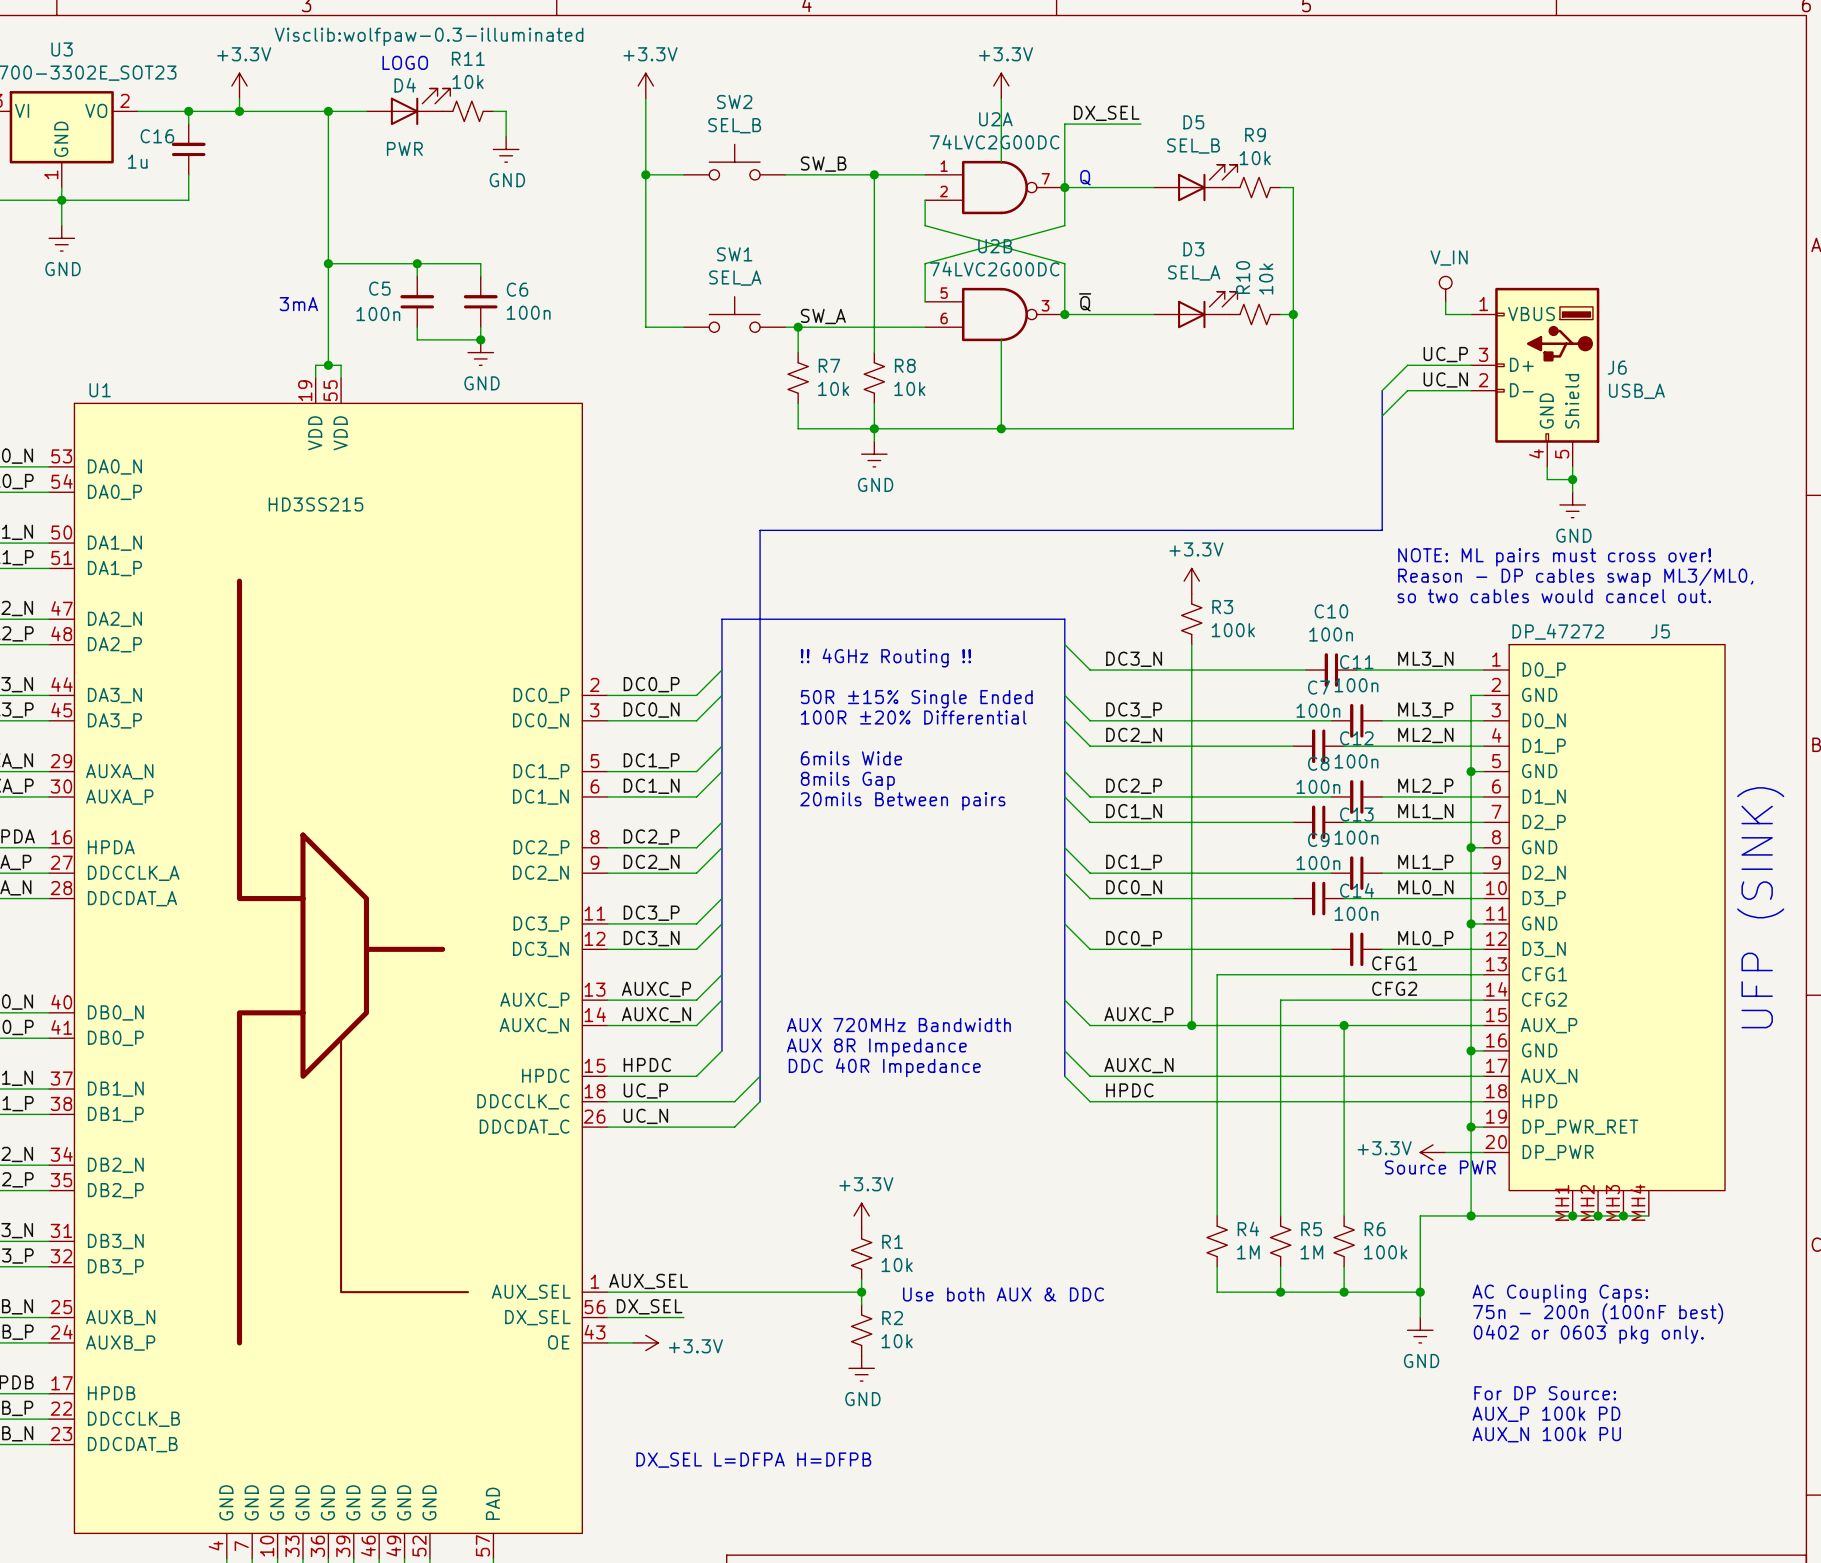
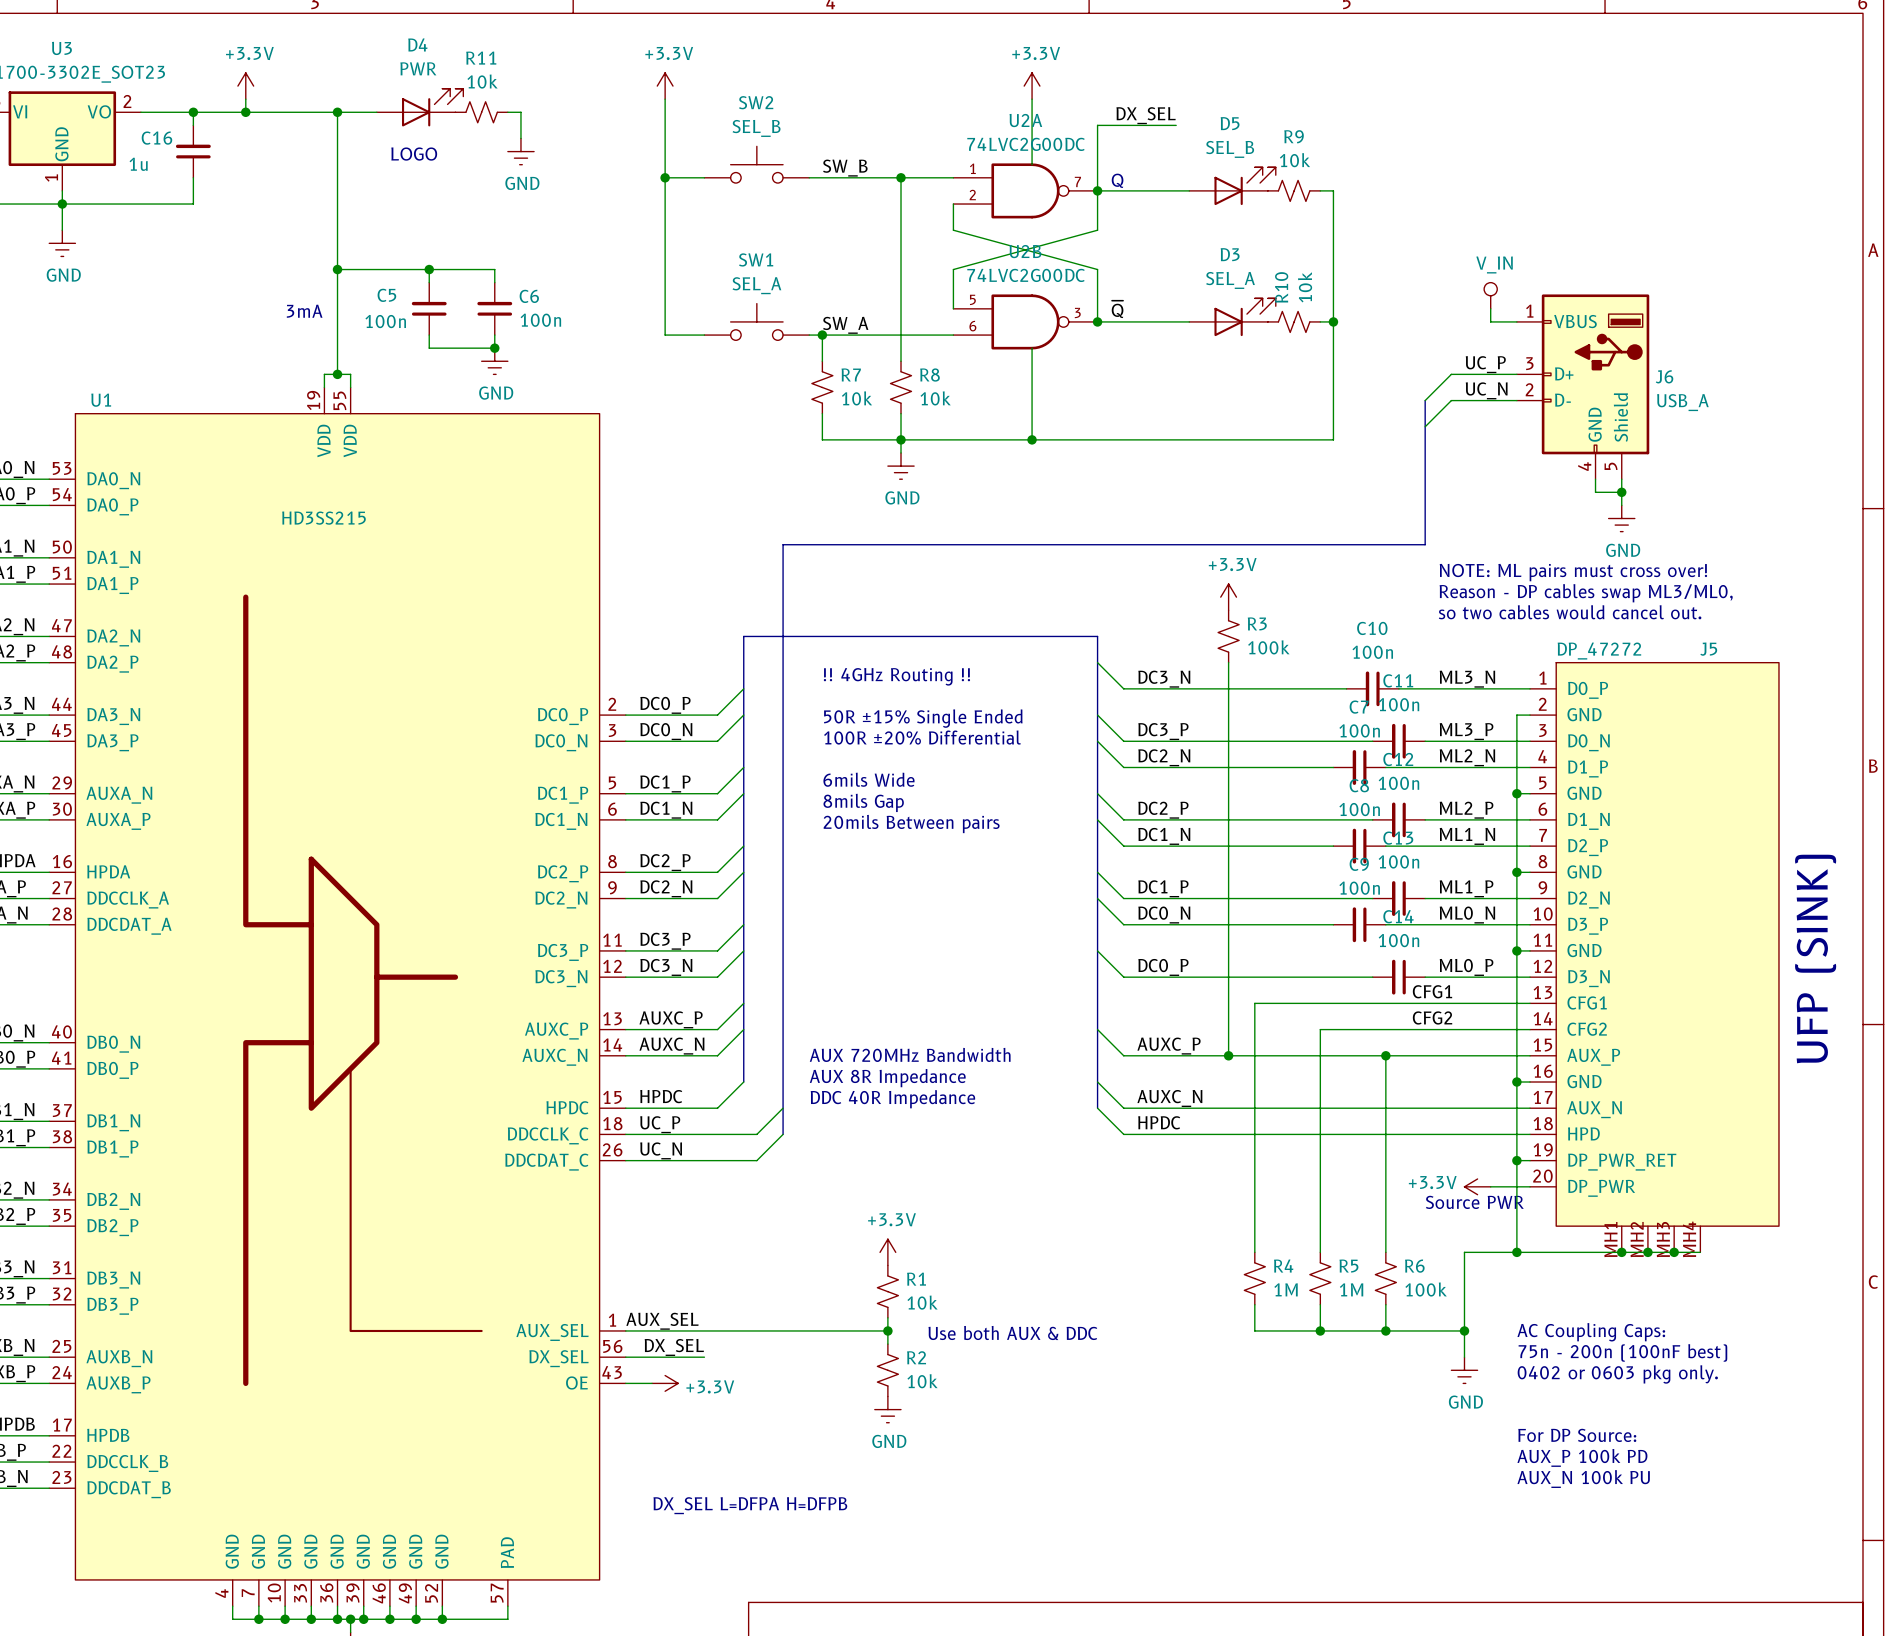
D4 text: Visclib:wolfpaw-0.3-illuminated (429, 36) -> none
text position: LOGO (405, 62) -> LOGO (414, 154)
D4 name position: D4 (405, 85) -> D4 (417, 44)
D4 value position: PWR (404, 148) -> PWR (418, 68)

